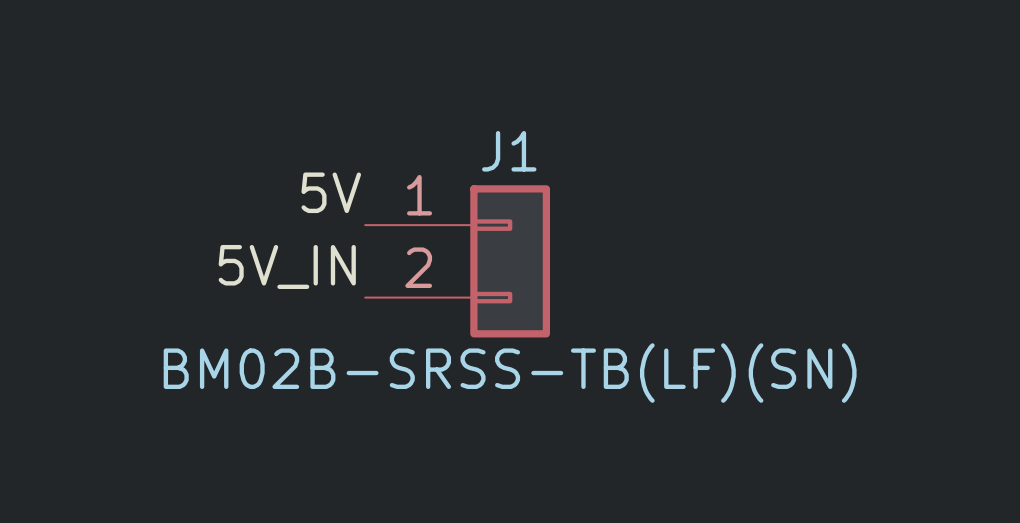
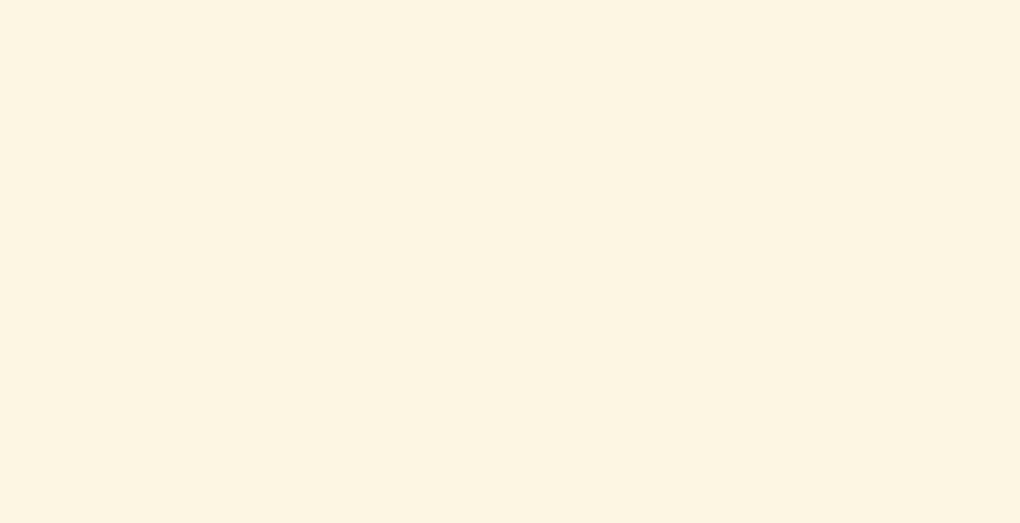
label: 5V (331, 192) -> none
J1: BM02B-SRSS-TB(LF)(SN) (457, 261) -> none
label: 5V_IN (287, 266) -> none

